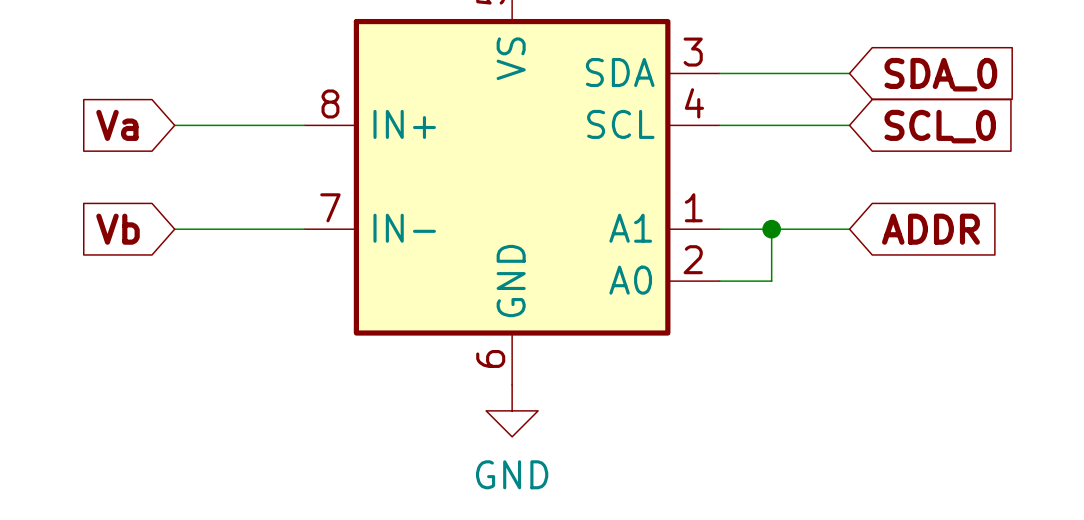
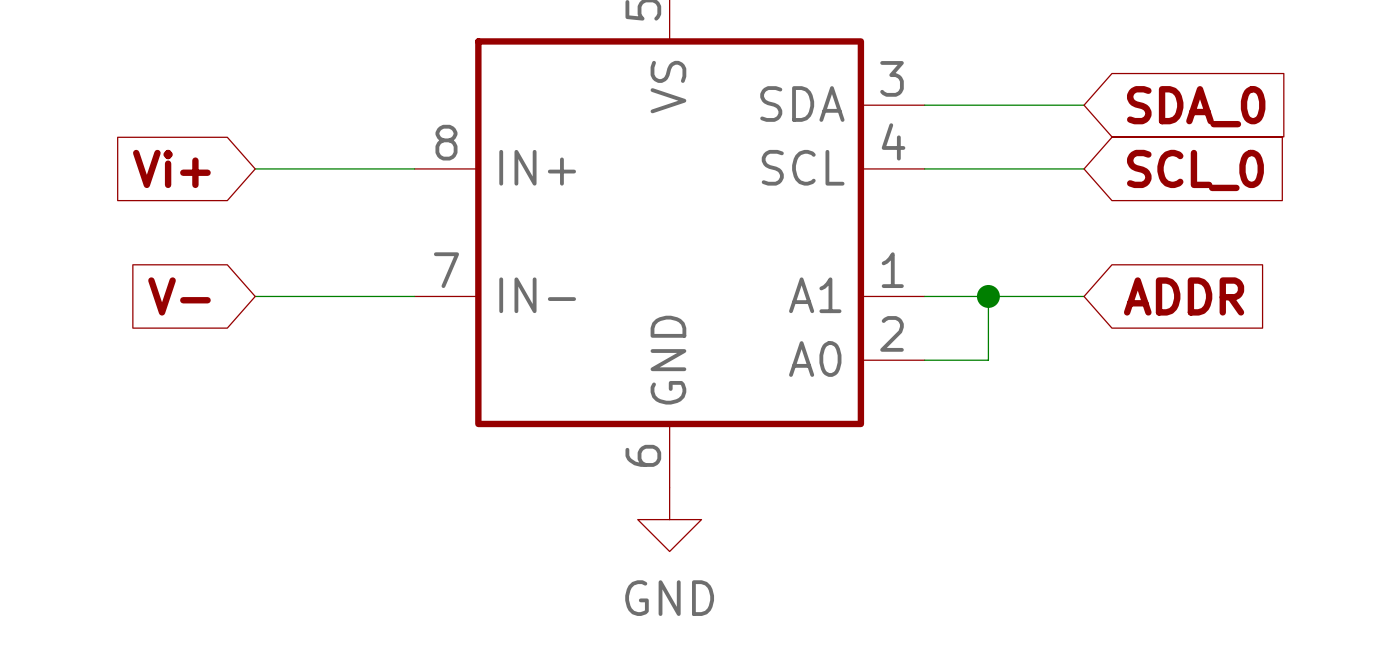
global label: Va (117, 125) -> Vi+ (171, 168)
global label: Vb (118, 229) -> V- (179, 296)

